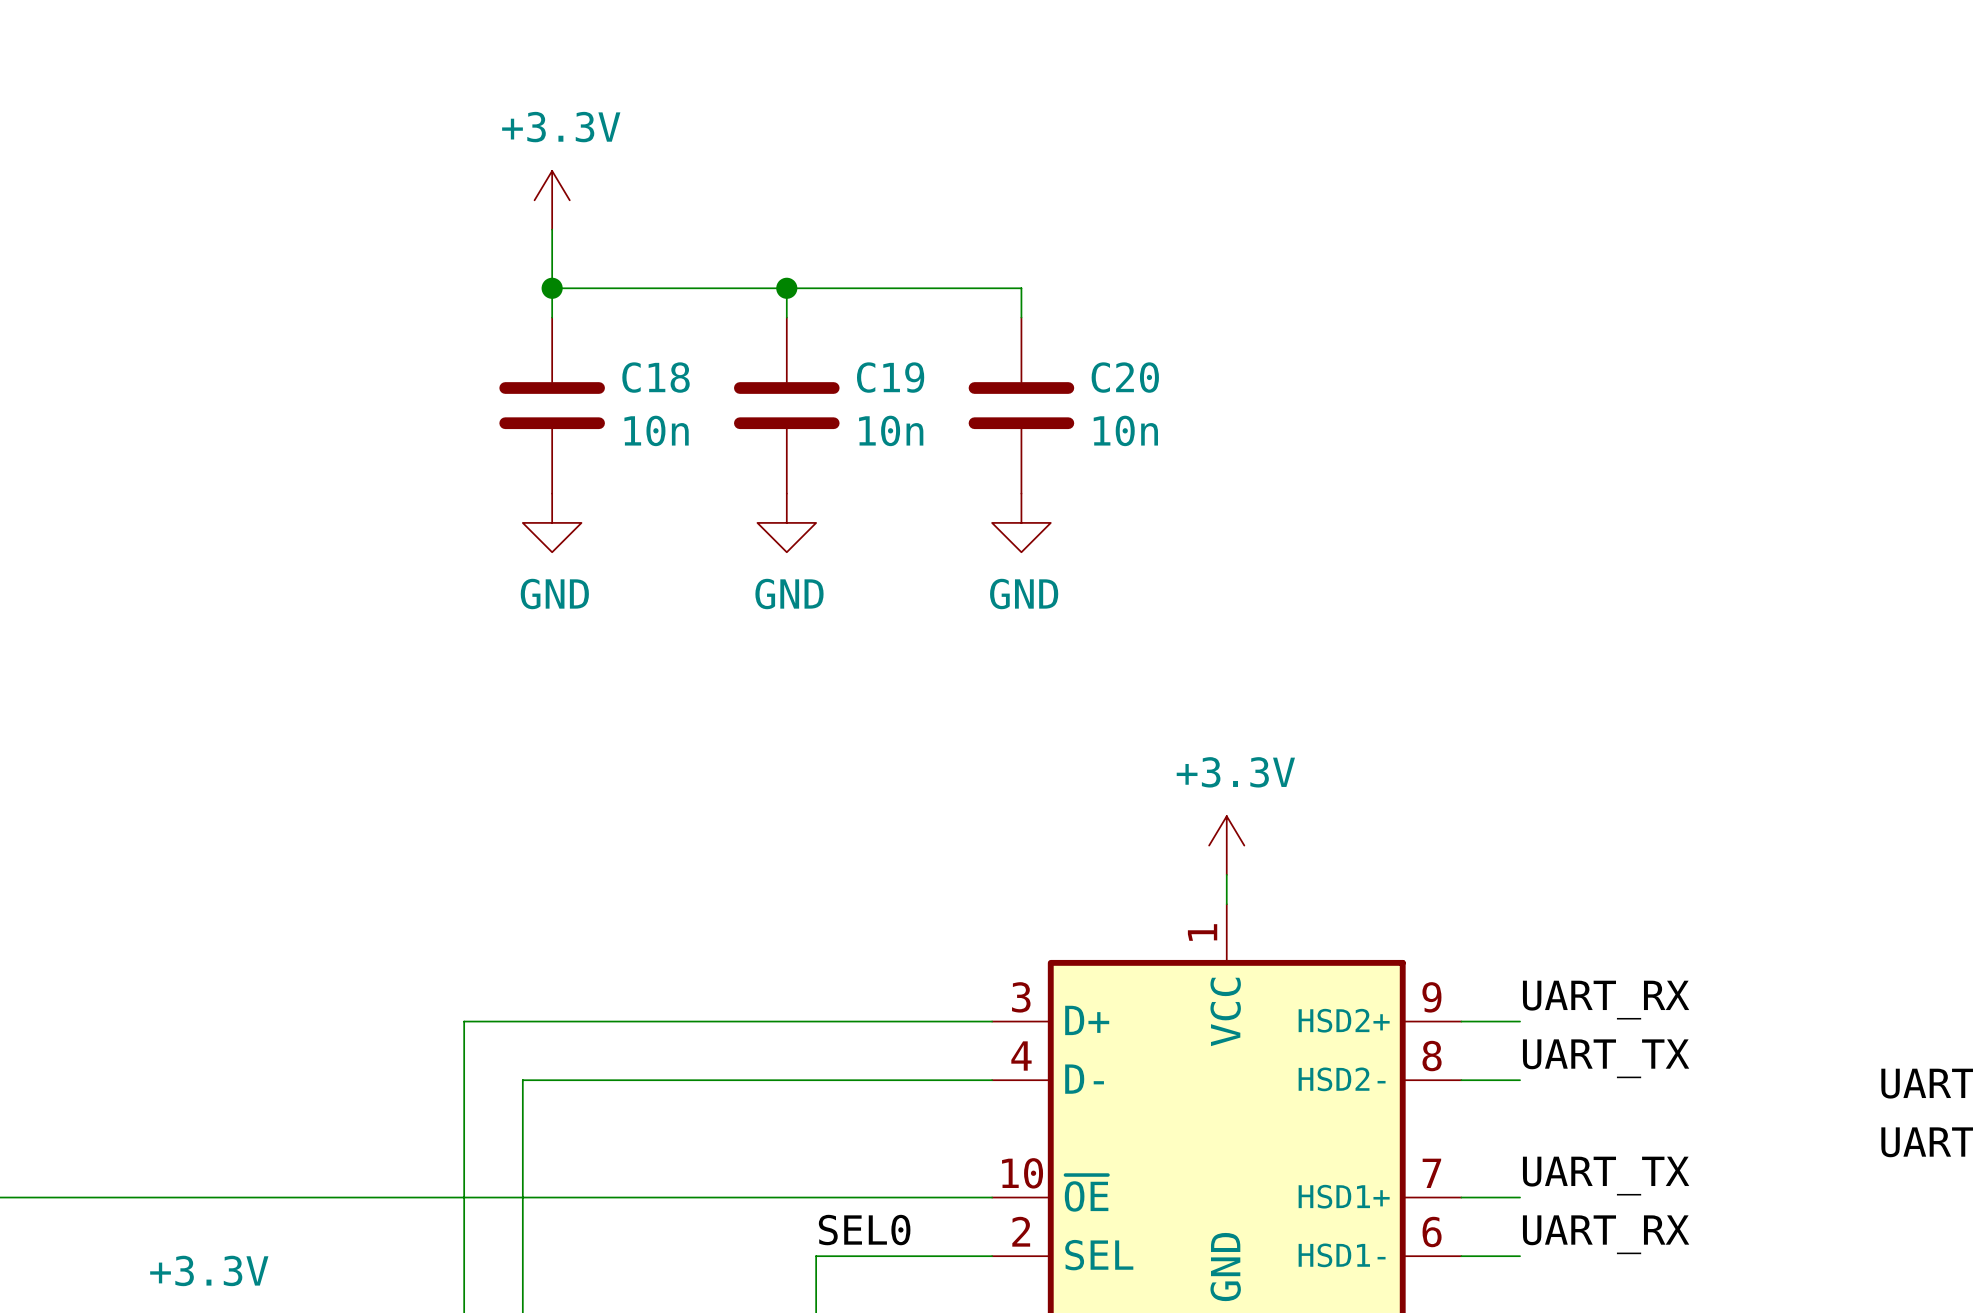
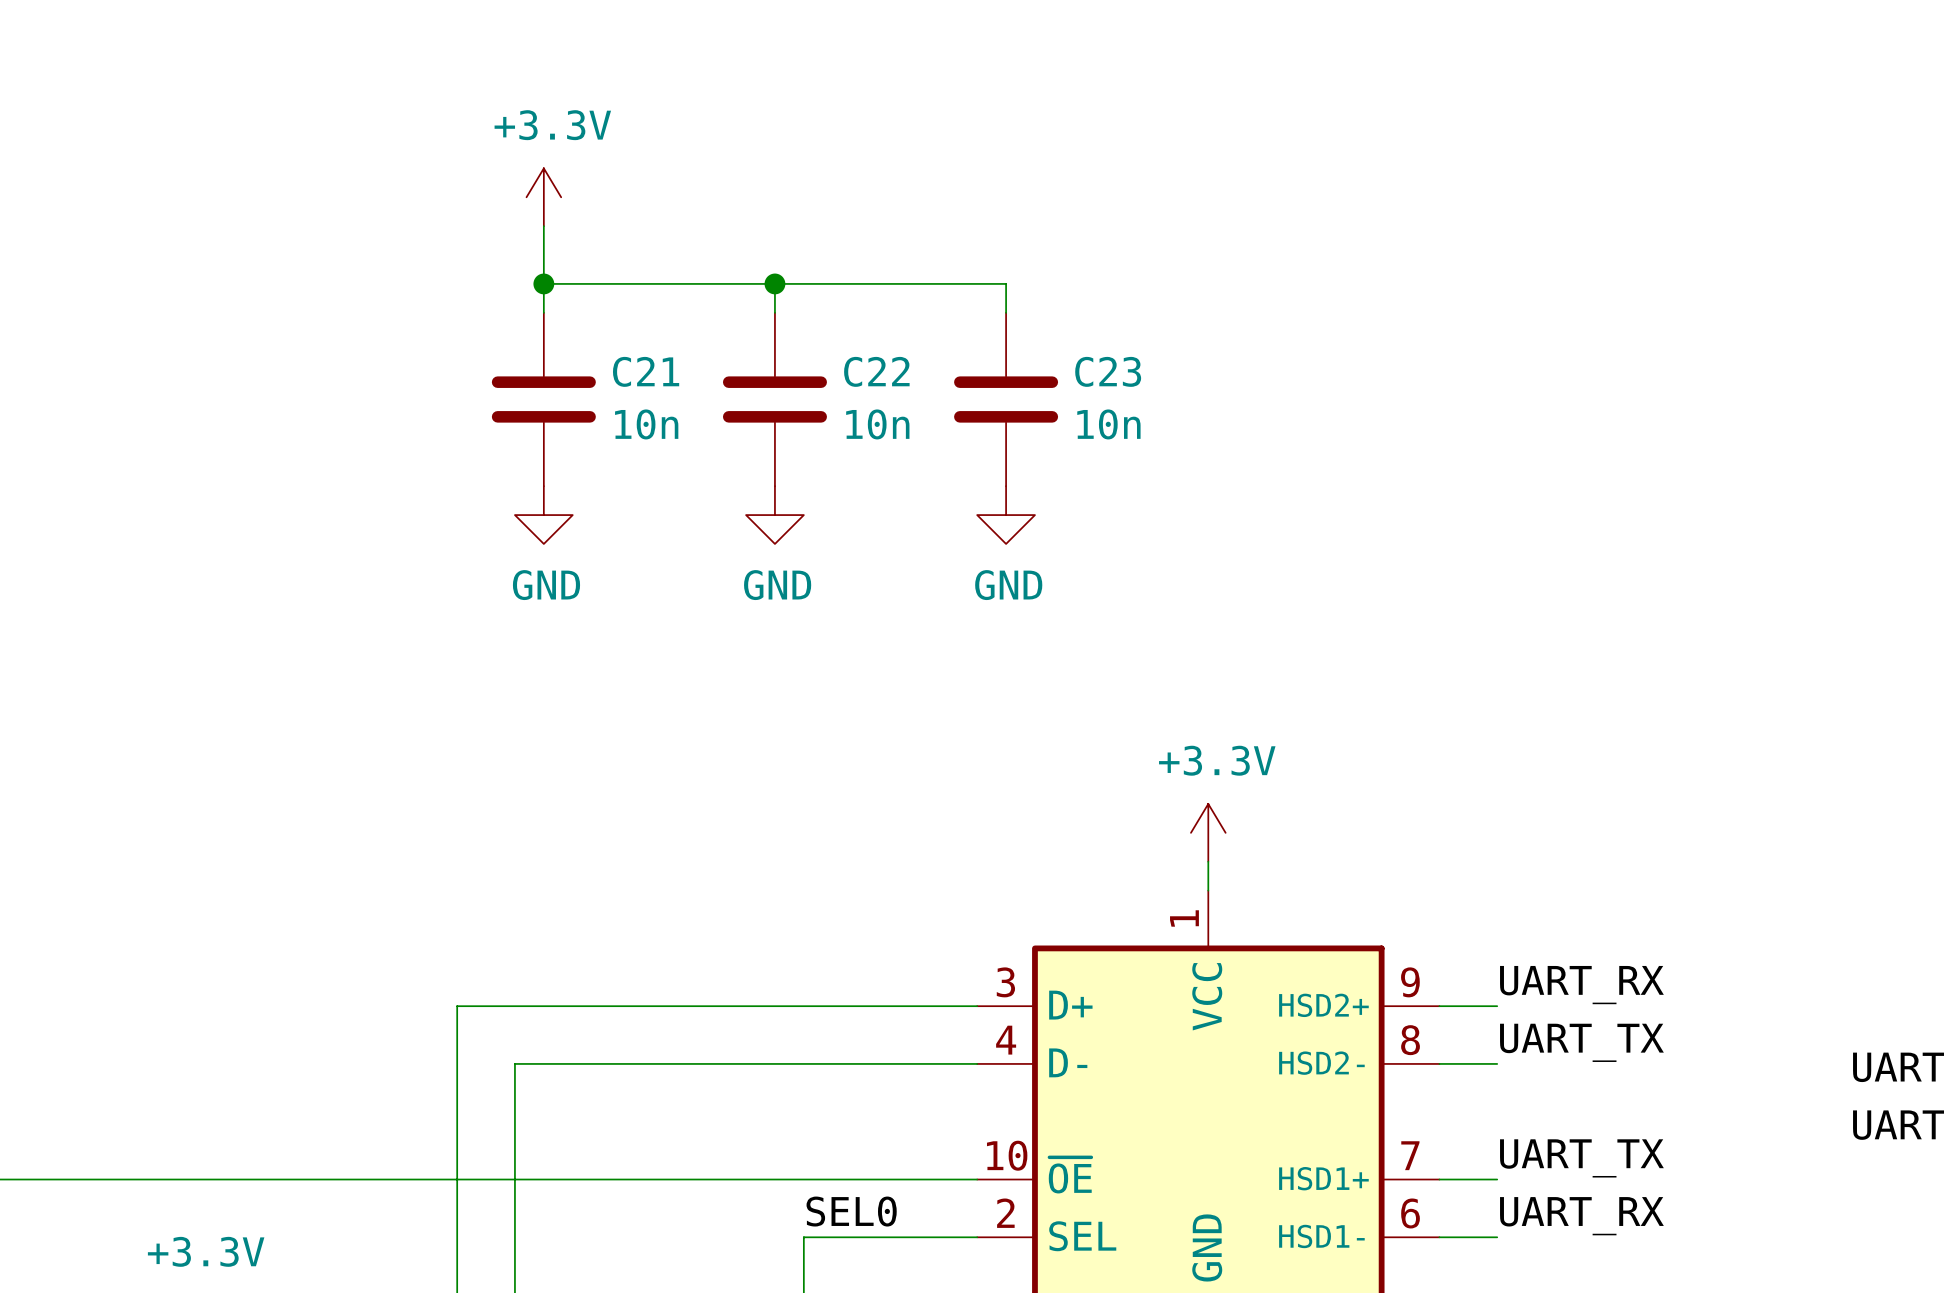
C18 name: C18 (656, 377) -> C21 (646, 371)
C19 name: C19 (890, 377) -> C22 (876, 371)
C20 name: C20 (1125, 377) -> C23 (1108, 371)

